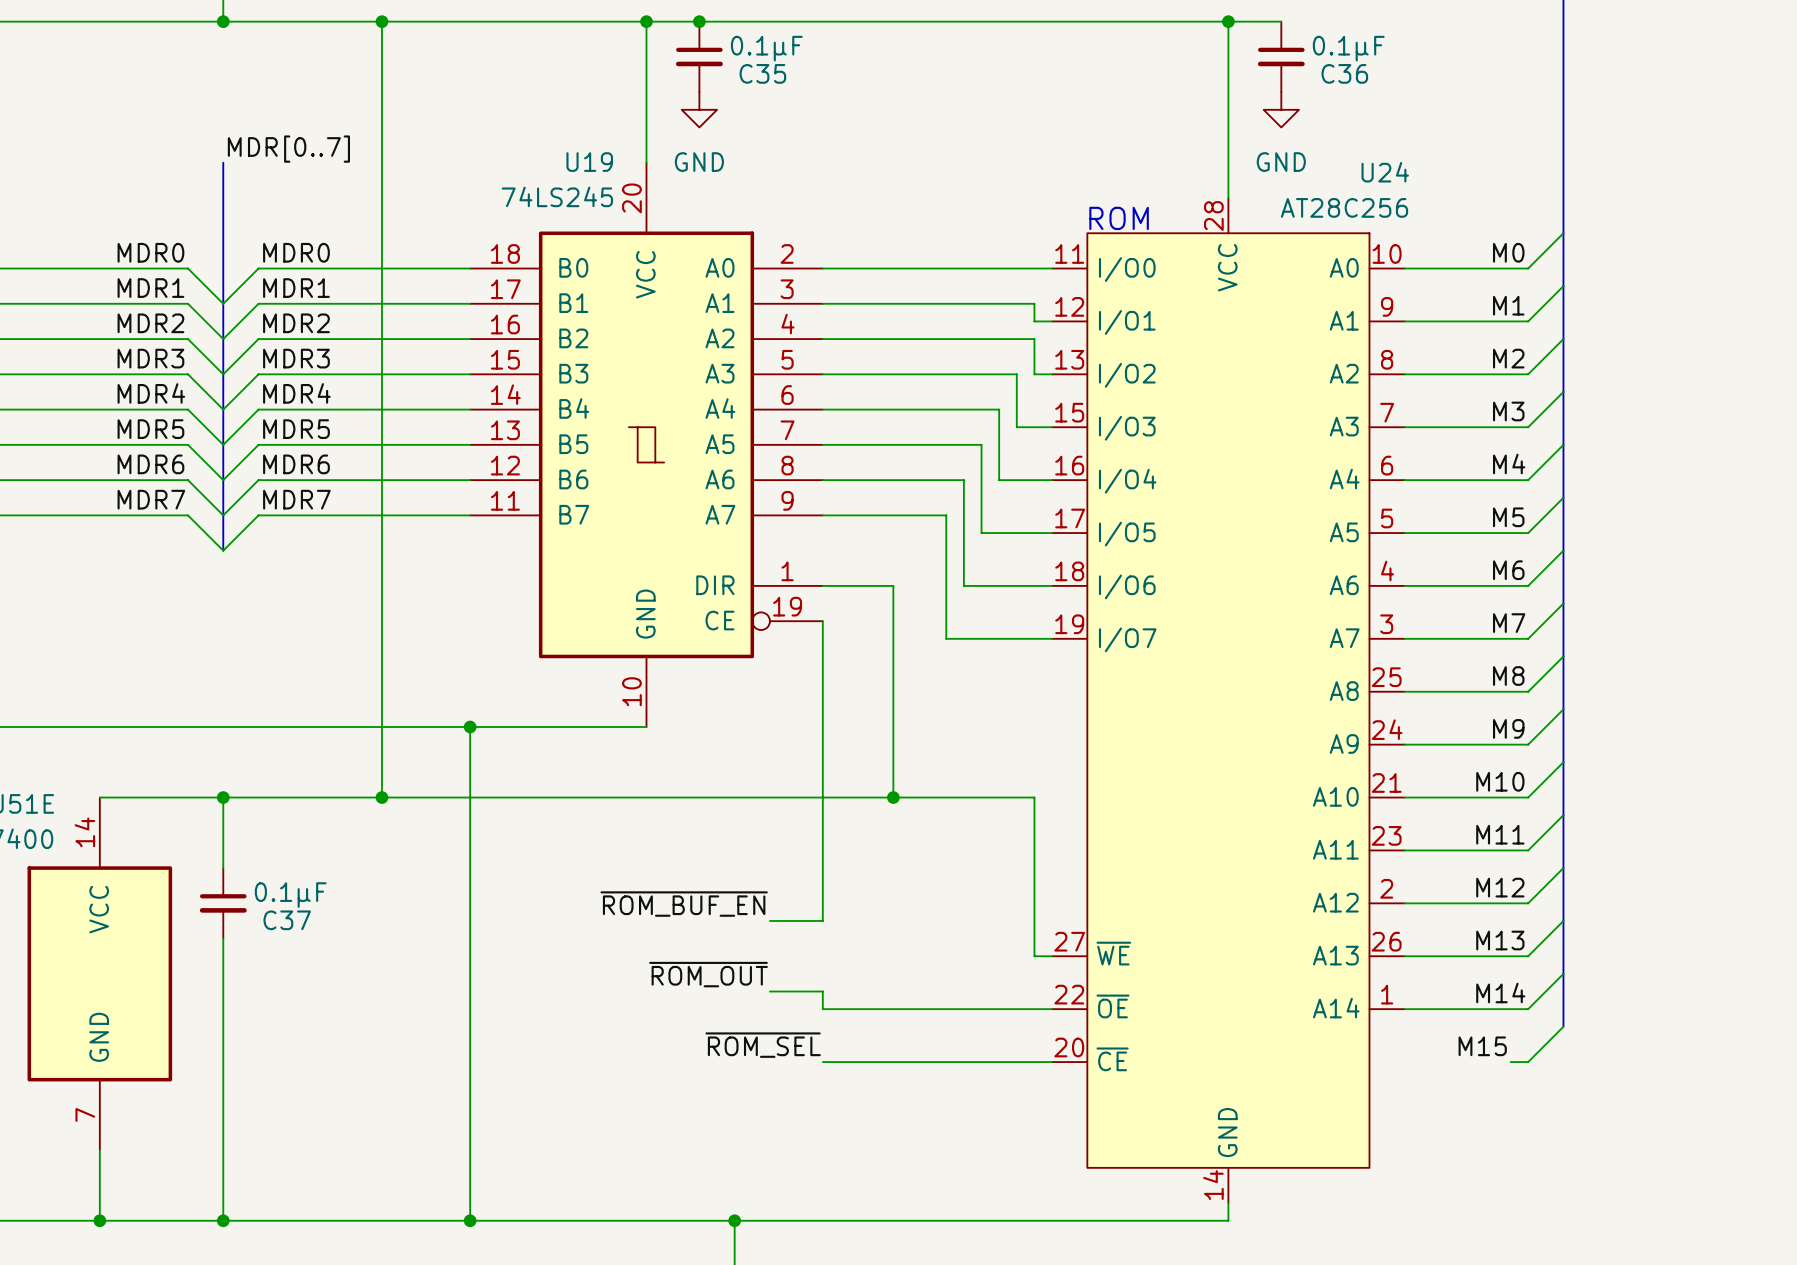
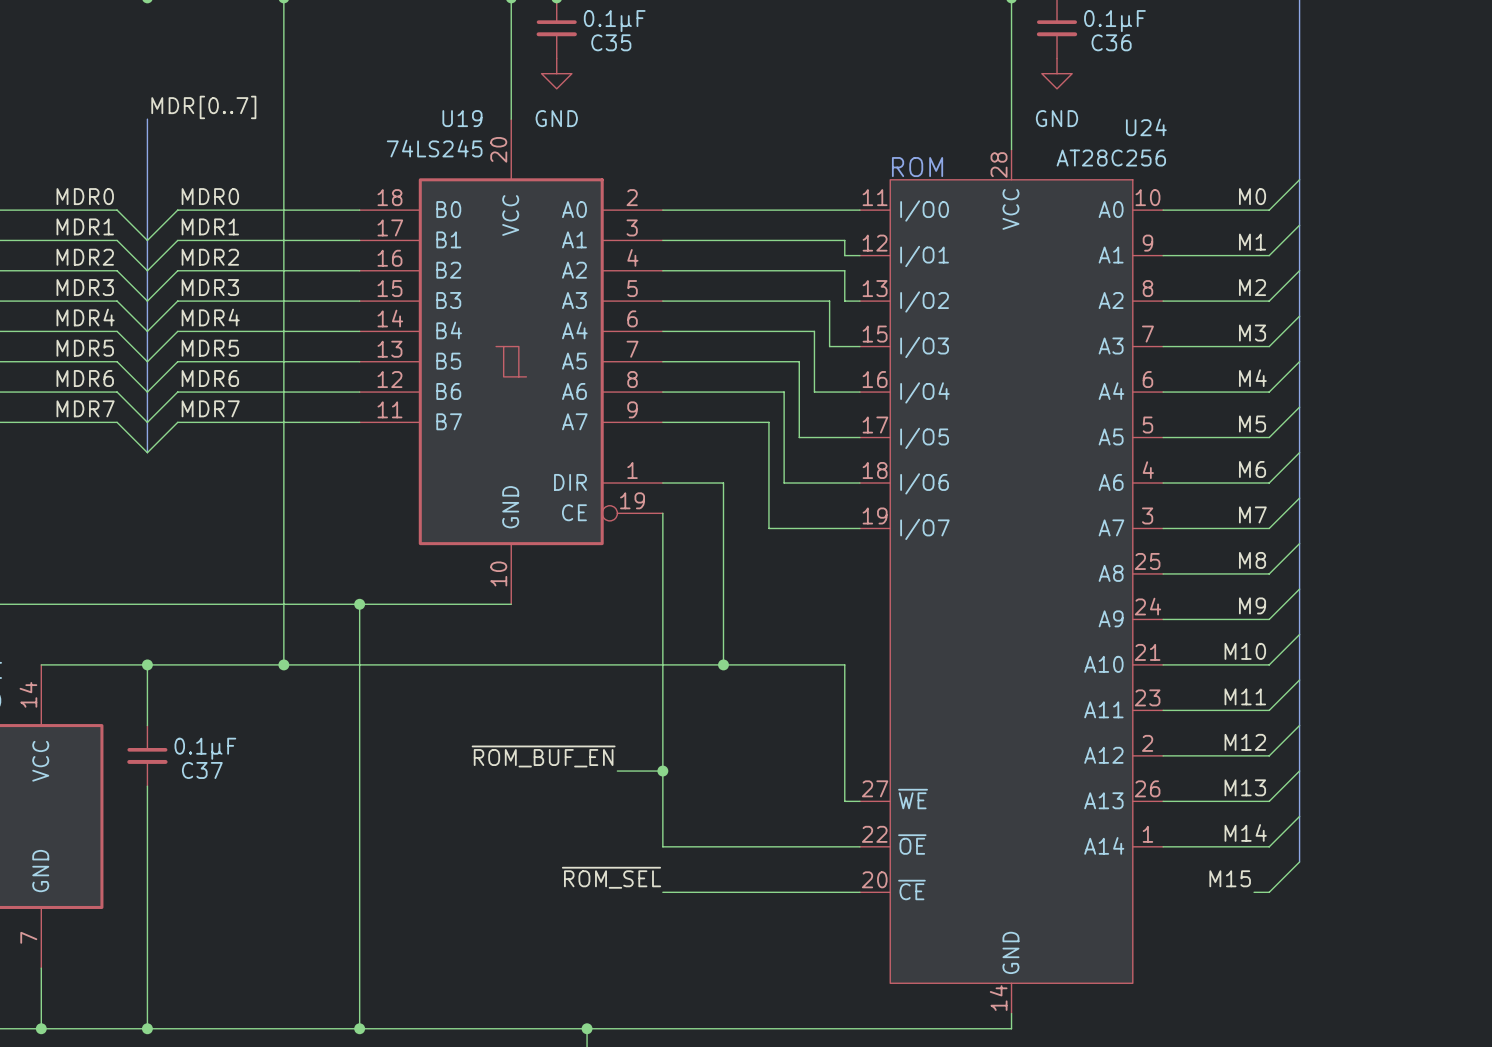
junction: none -> (662, 771)
label: ~{ROM_OUT} (708, 974) -> none
wire: (769, 991) (822, 991) -> (662, 771) (662, 831)

